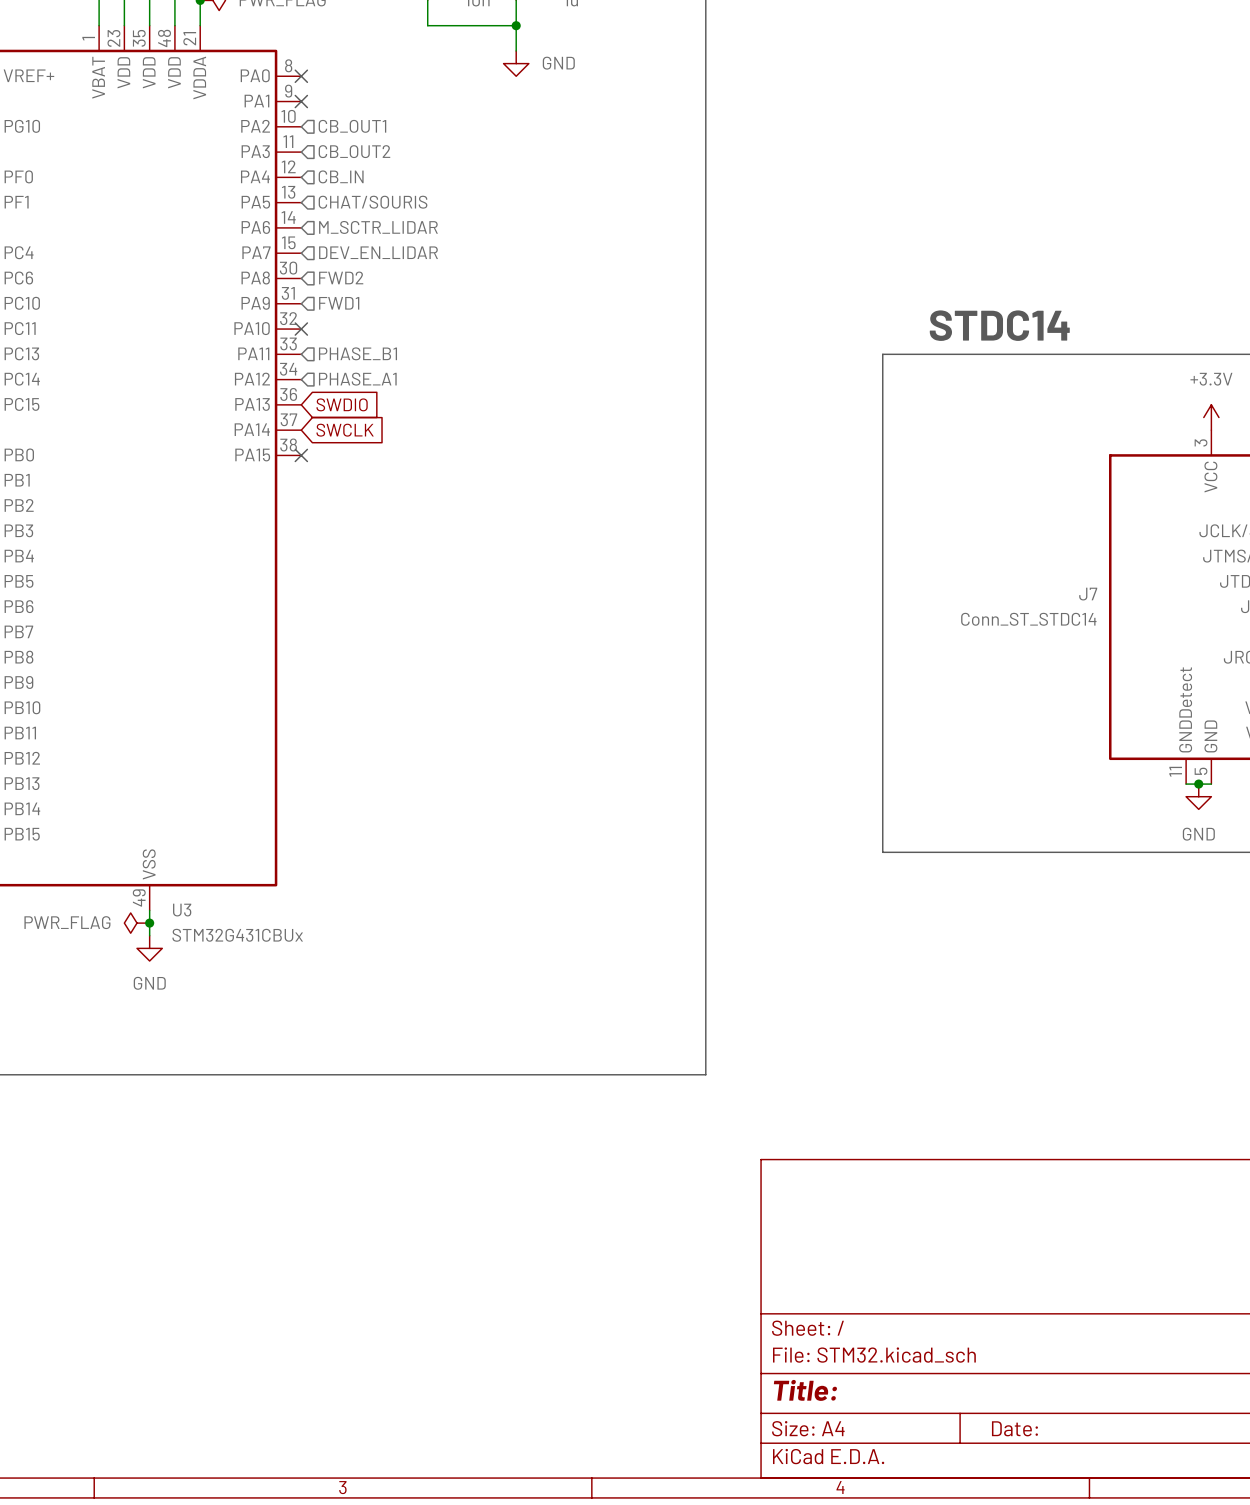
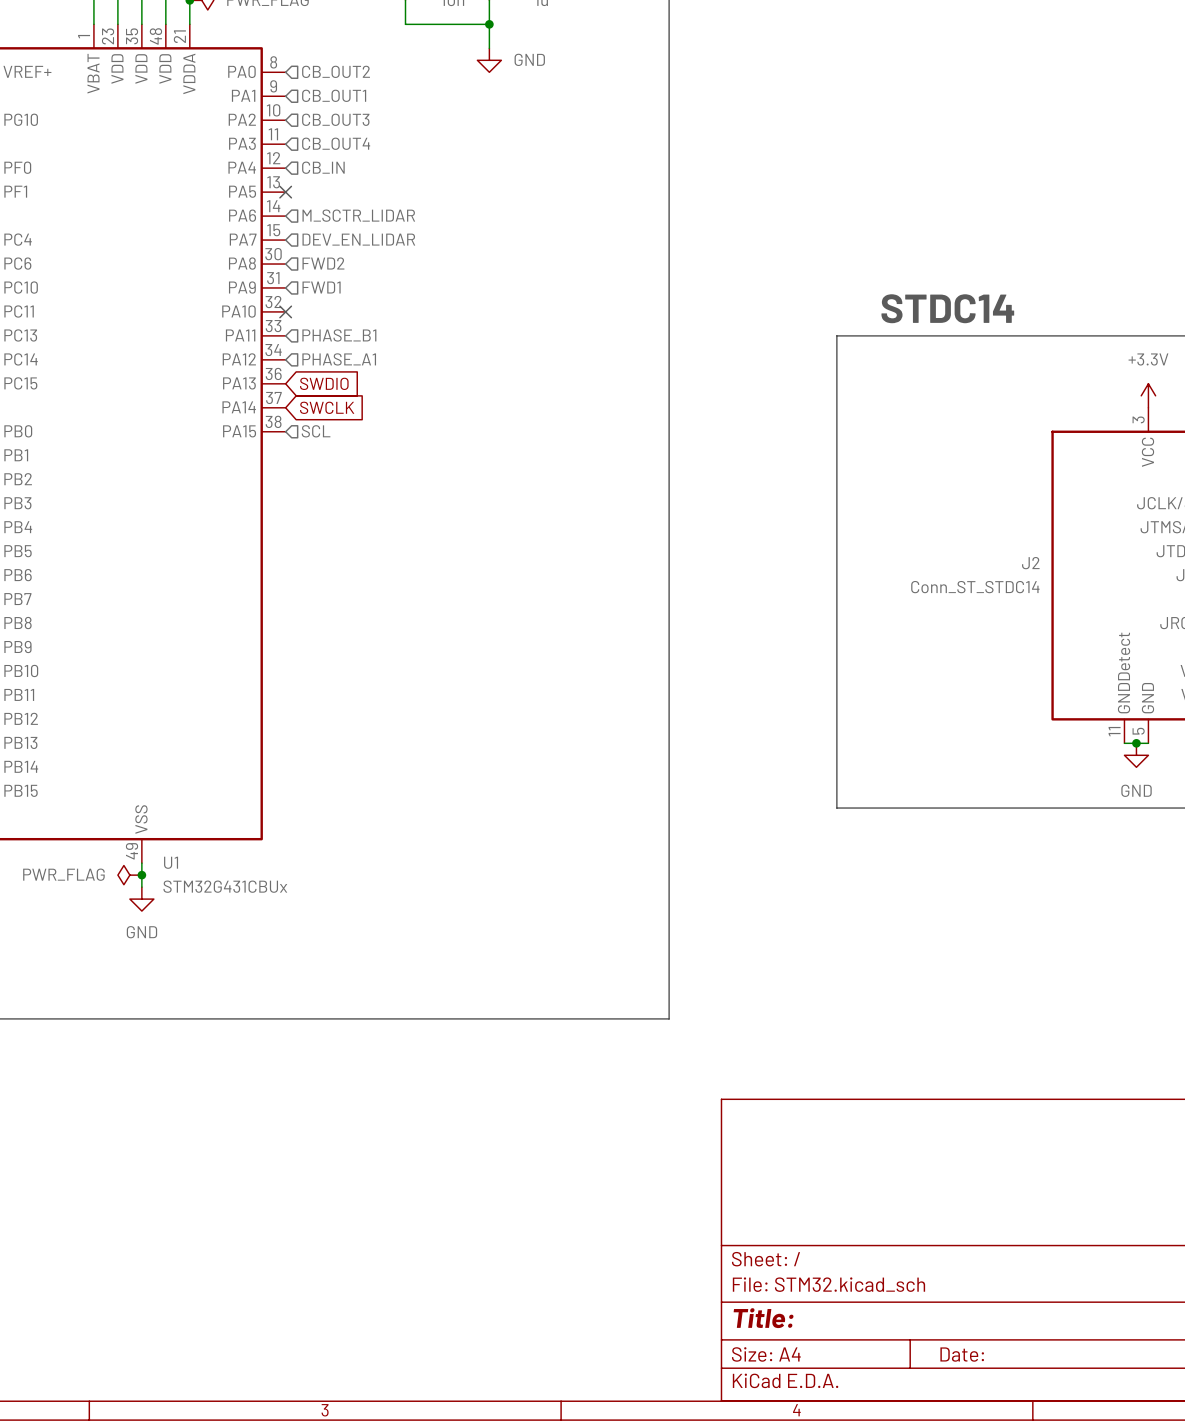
hierarchical label: none -> CB_OUT2 (336, 71)
no-connect mark: (301, 76) -> none
no-connect mark: (301, 101) -> none
hierarchical label: none -> CB_OUT1 (334, 95)
hierarchical label: CB_OUT1 (352, 126) -> CB_OUT3 (335, 119)
hierarchical label: CB_OUT2 (354, 151) -> CB_OUT4 (336, 143)
no-connect mark: none -> (285, 192)
hierarchical label: CHAT/SOURIS (373, 202) -> none
hierarchical label: none -> SCL (316, 431)
no-connect mark: (301, 455) -> none
J7 name: J7 (1088, 594) -> J2 (1030, 563)
U3 name: U3 (182, 910) -> U1 (171, 862)

